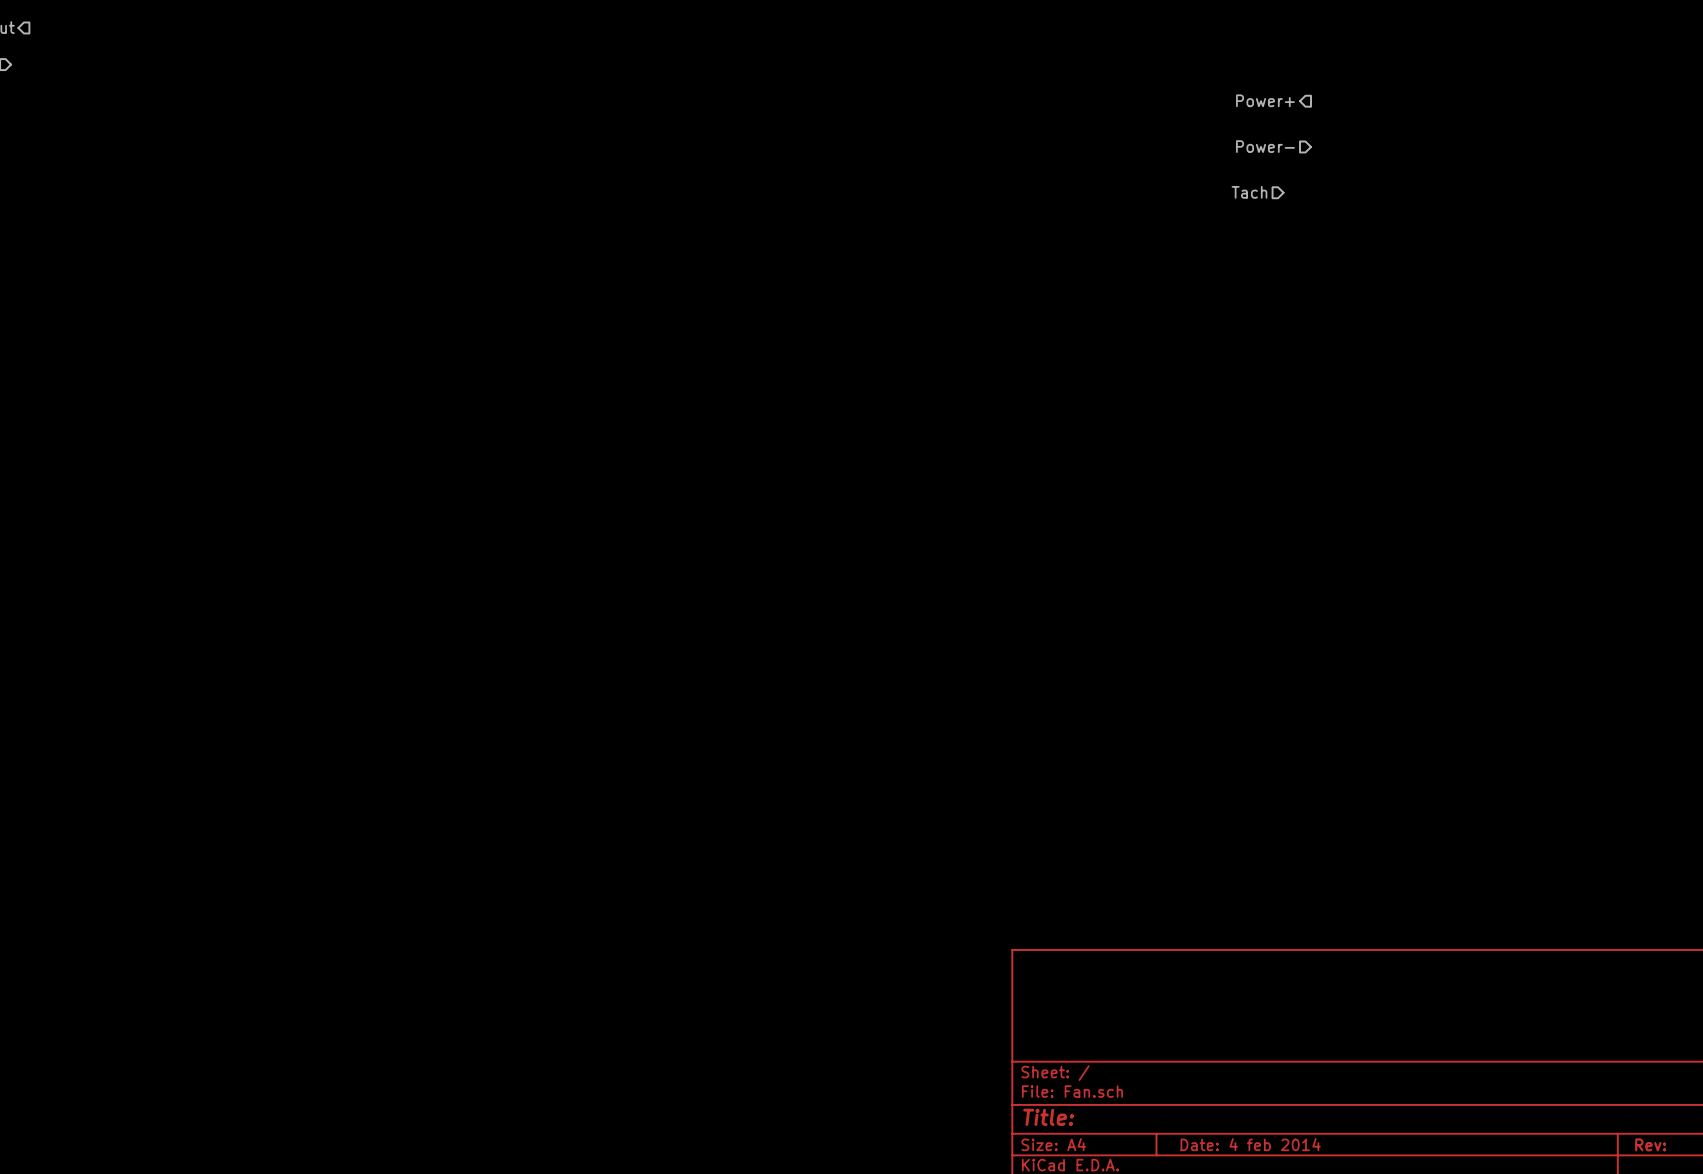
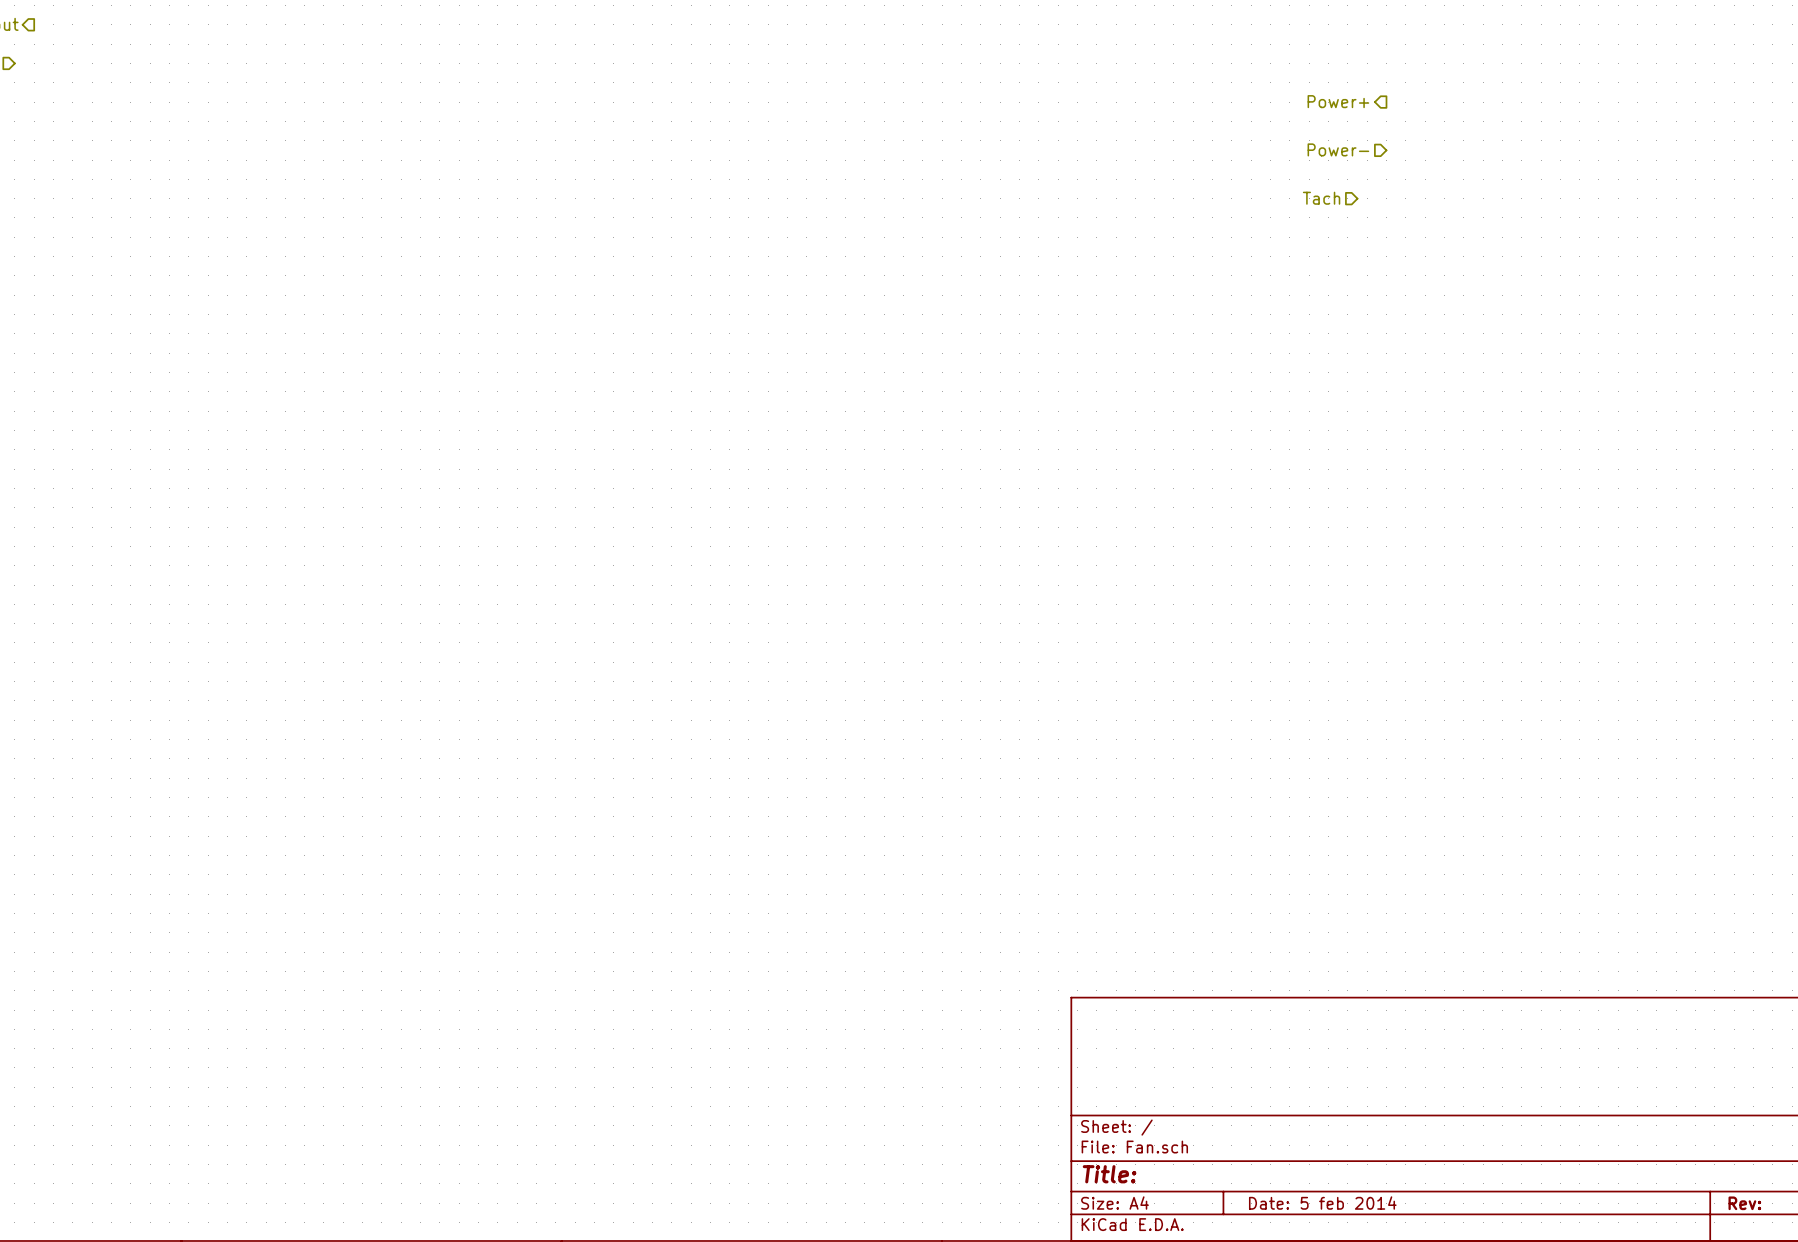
title block: Date: 4 feb 2014 (1250, 1144) -> Date: 5 feb 2014 (1322, 1203)

